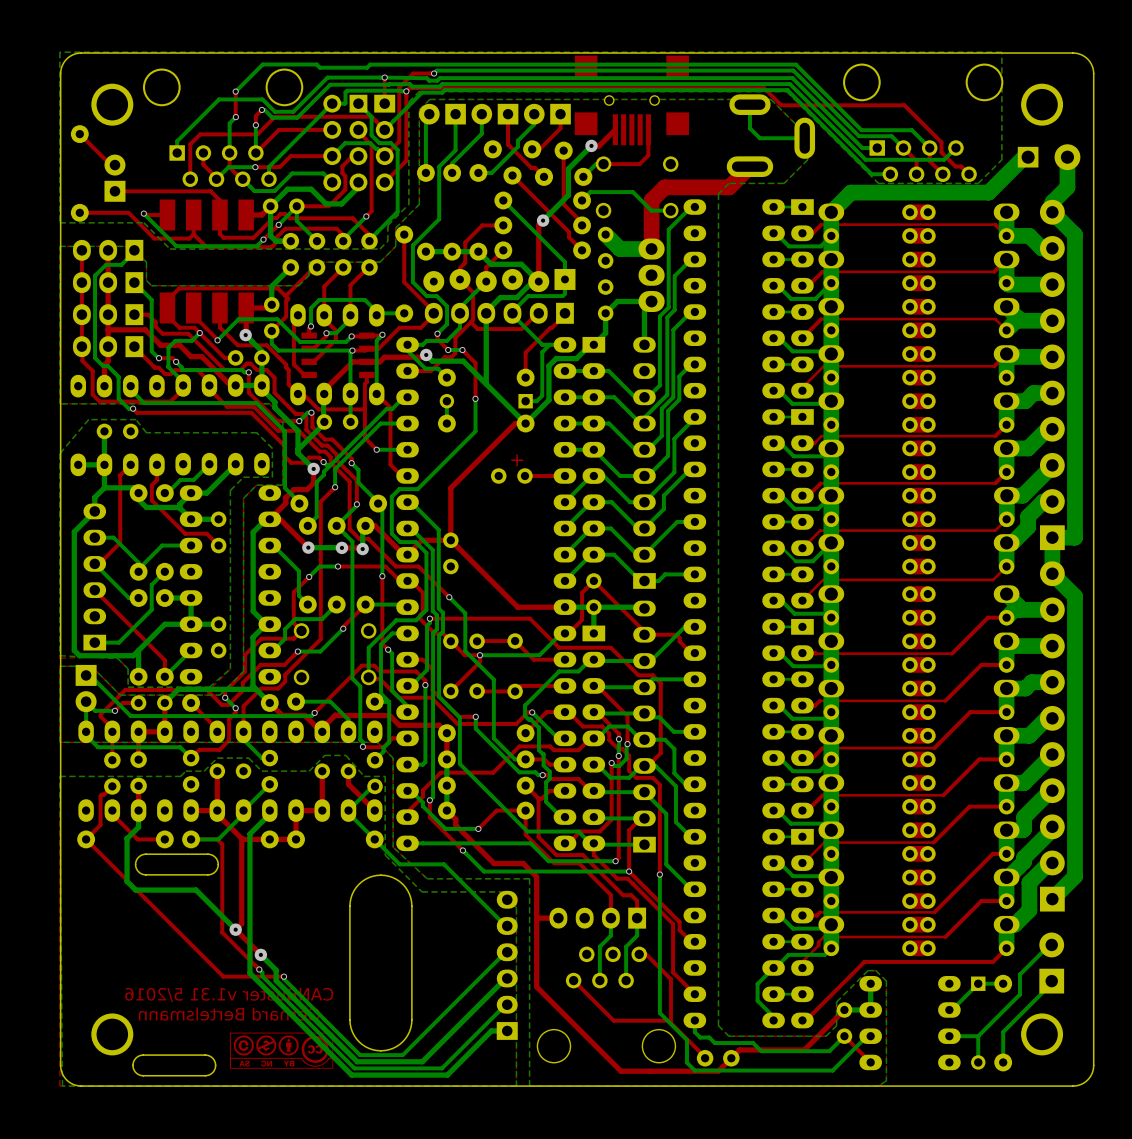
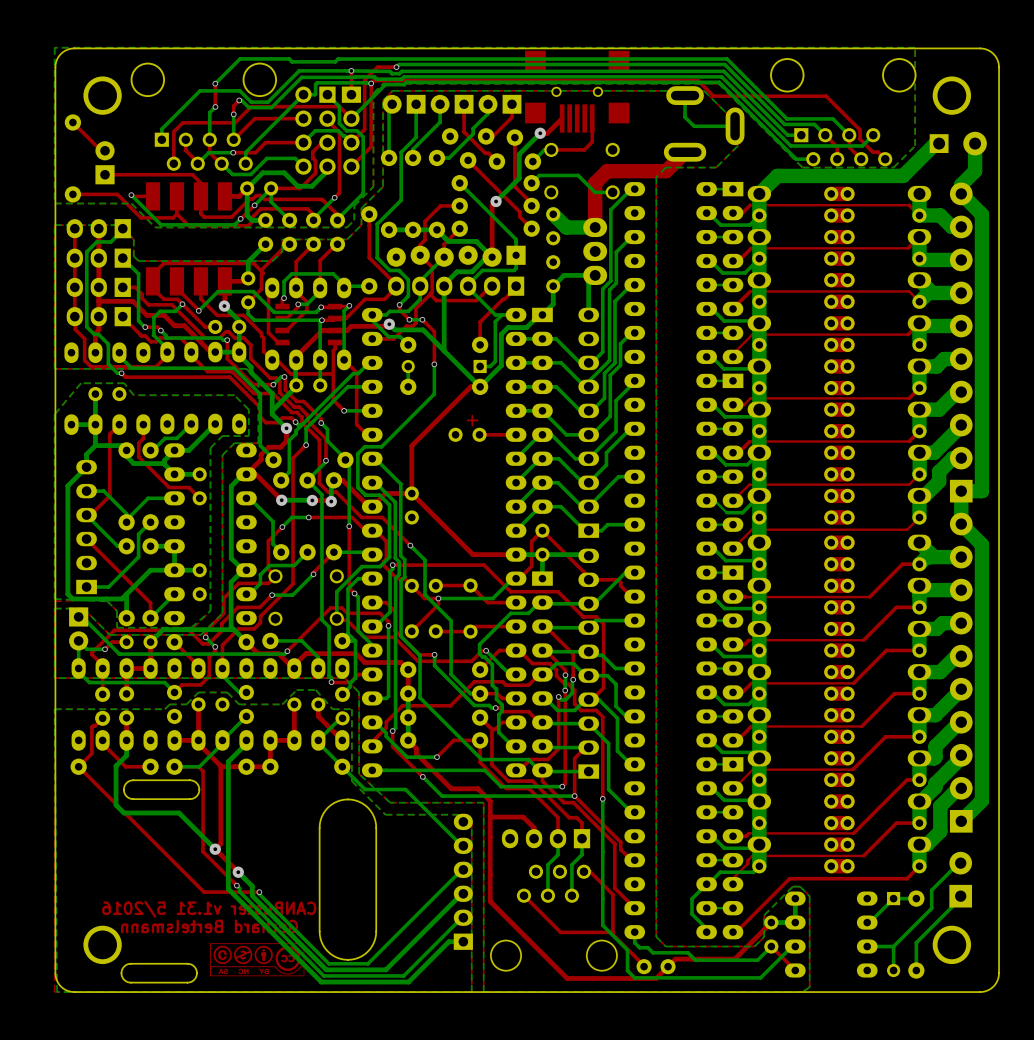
top track: none -> (490, 817) (523, 817) (534, 827) (534, 838)
top track: (536, 916) (538, 918) (558, 918) -> none

